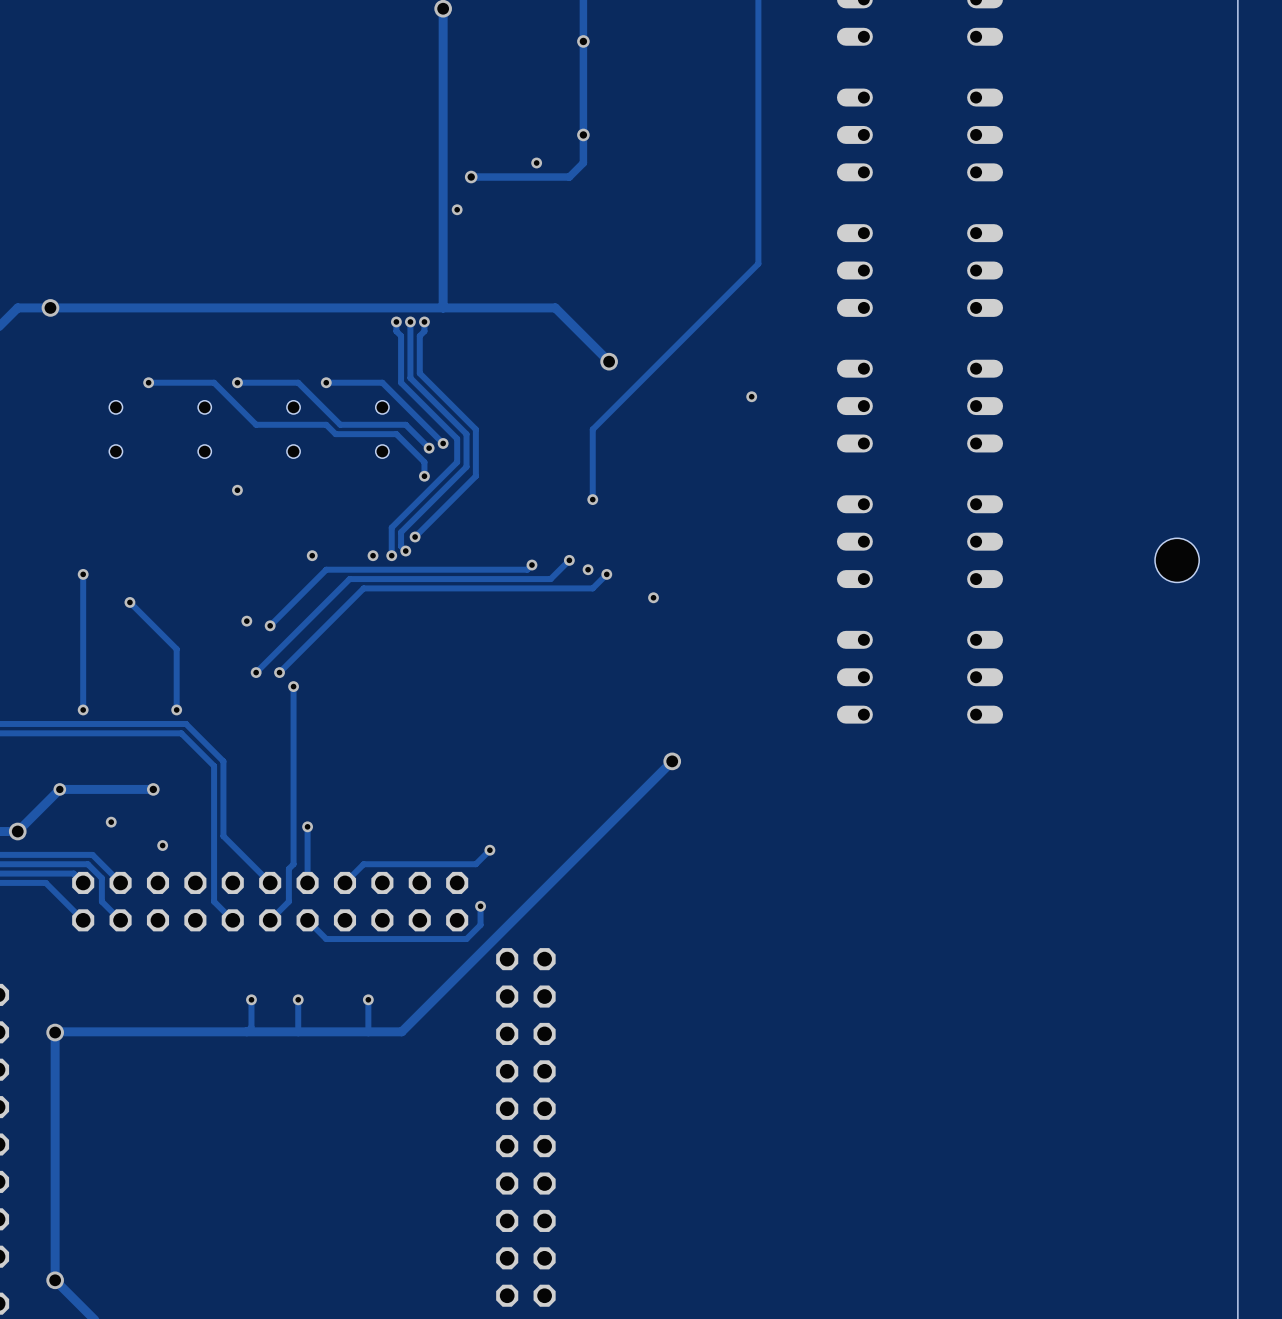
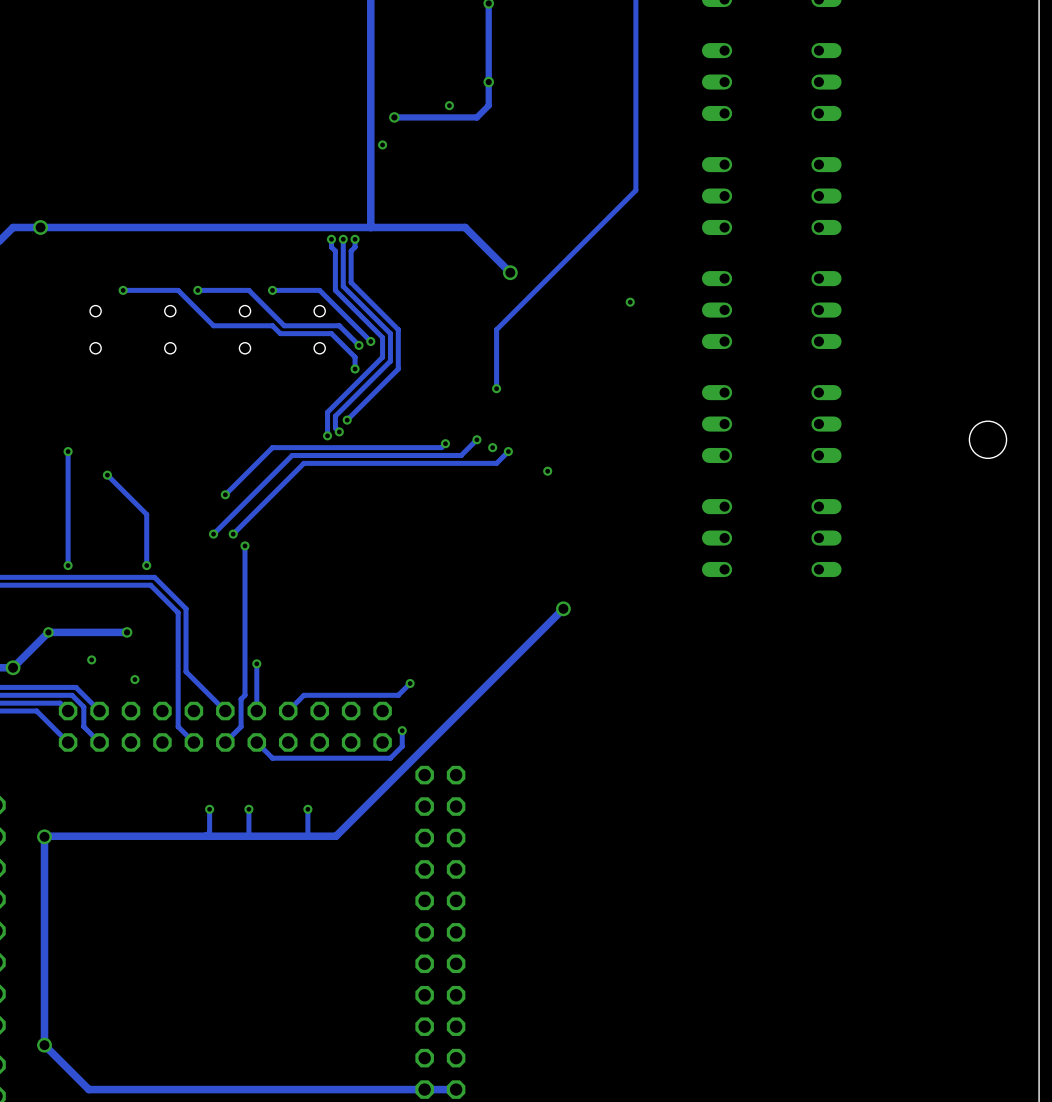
via: (237, 490) -> none
via: (312, 555) -> none
via: (373, 555) -> none
via: (246, 621) -> none

